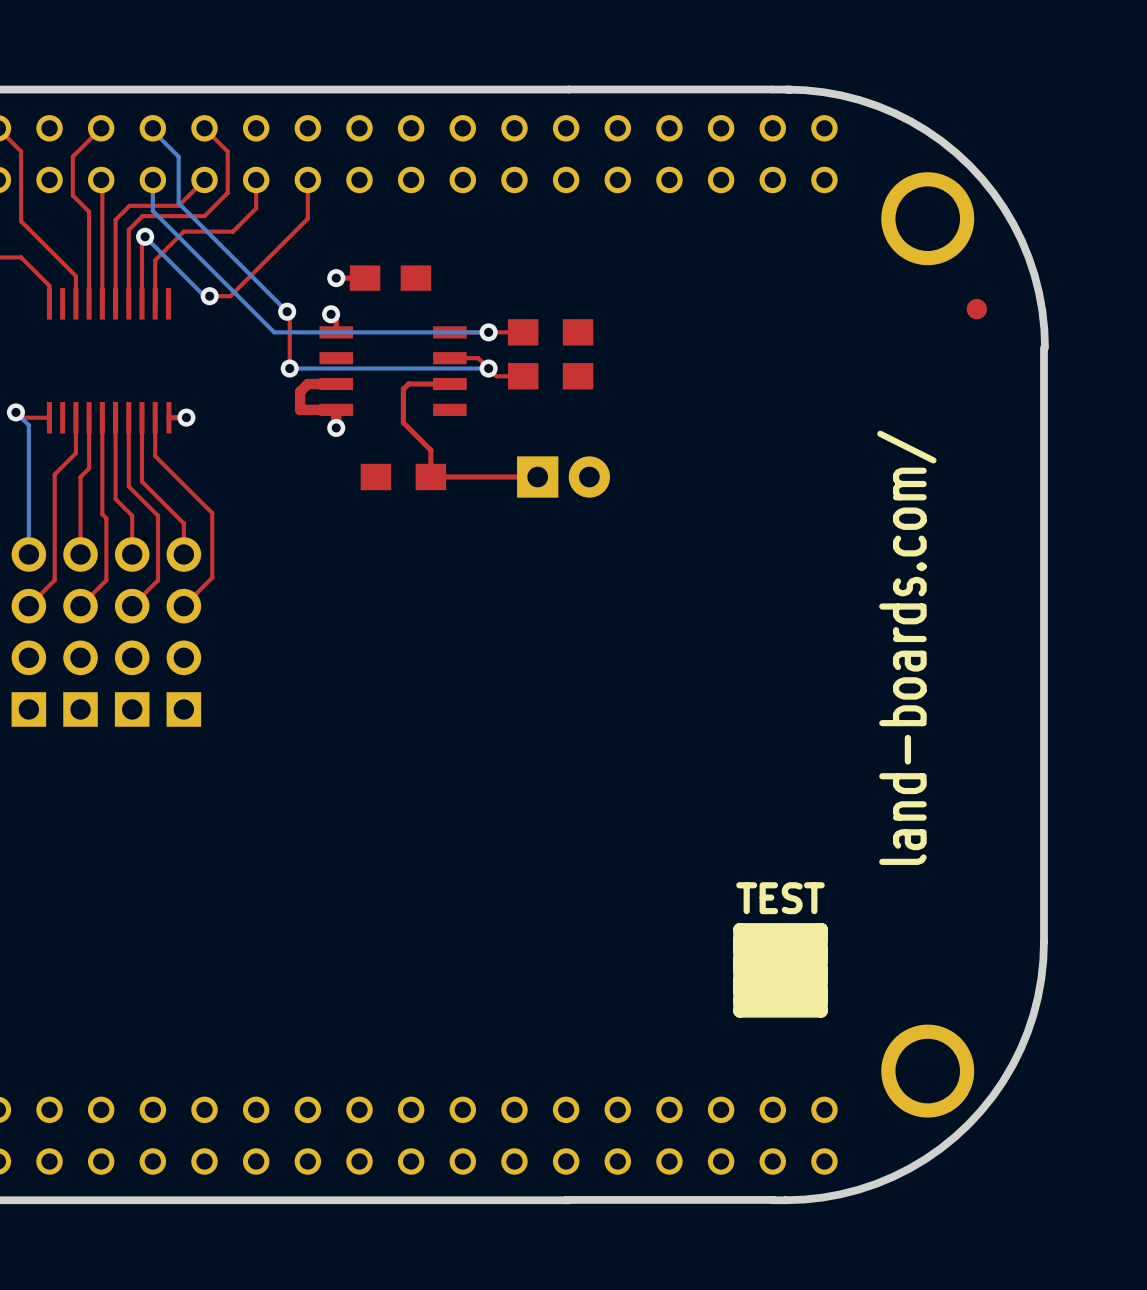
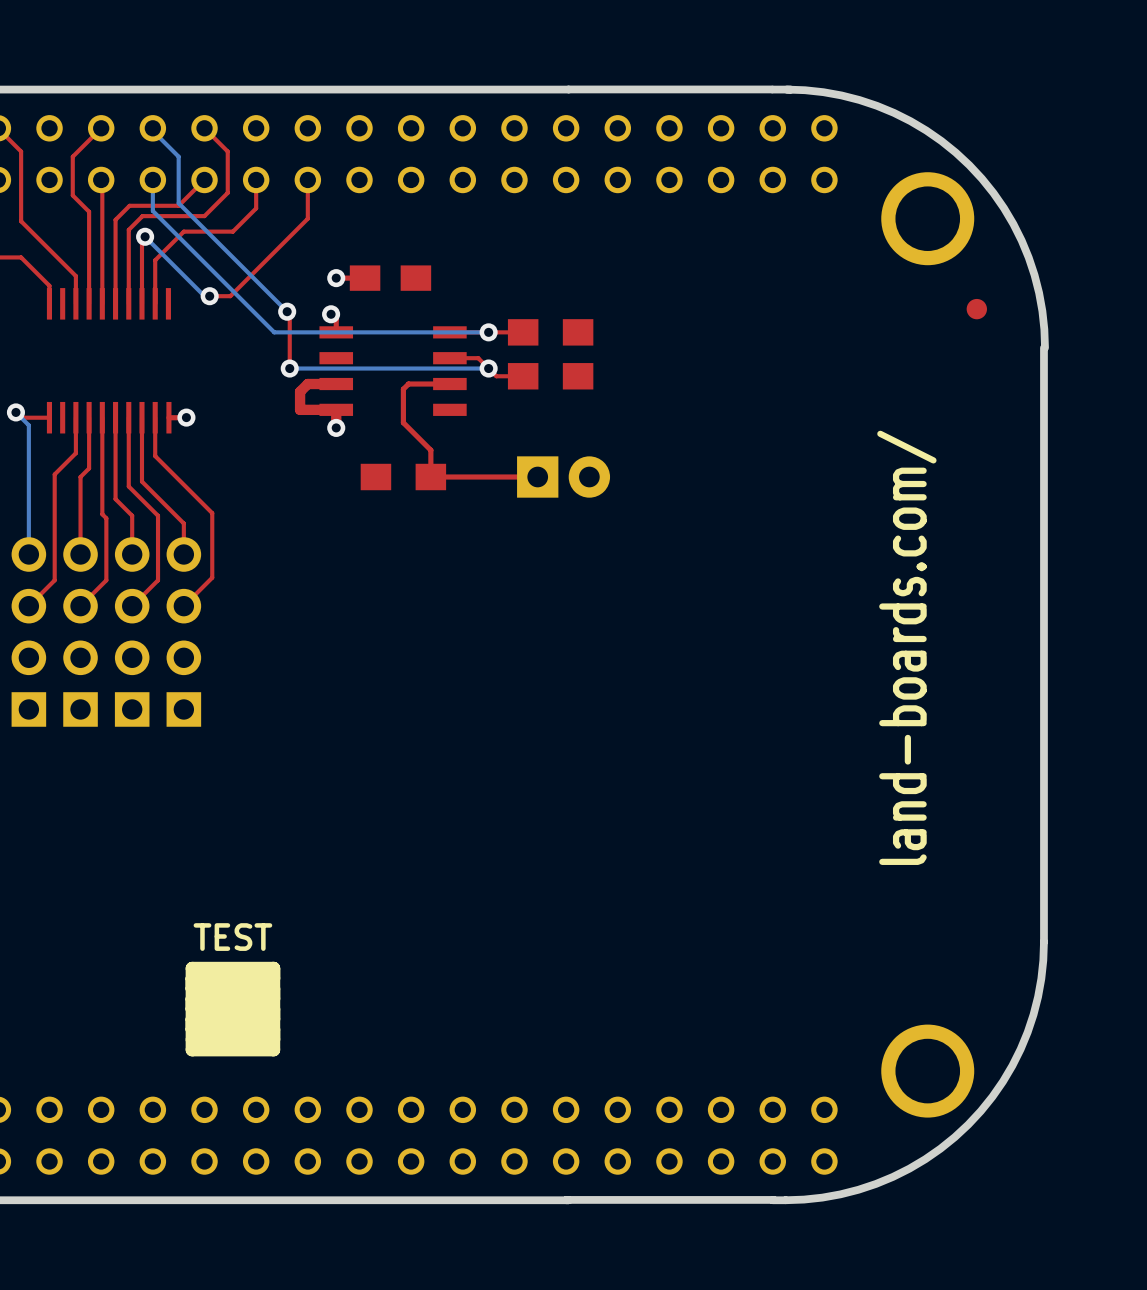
TEST: (780, 970) -> none
TEST: none -> (232, 1009)

